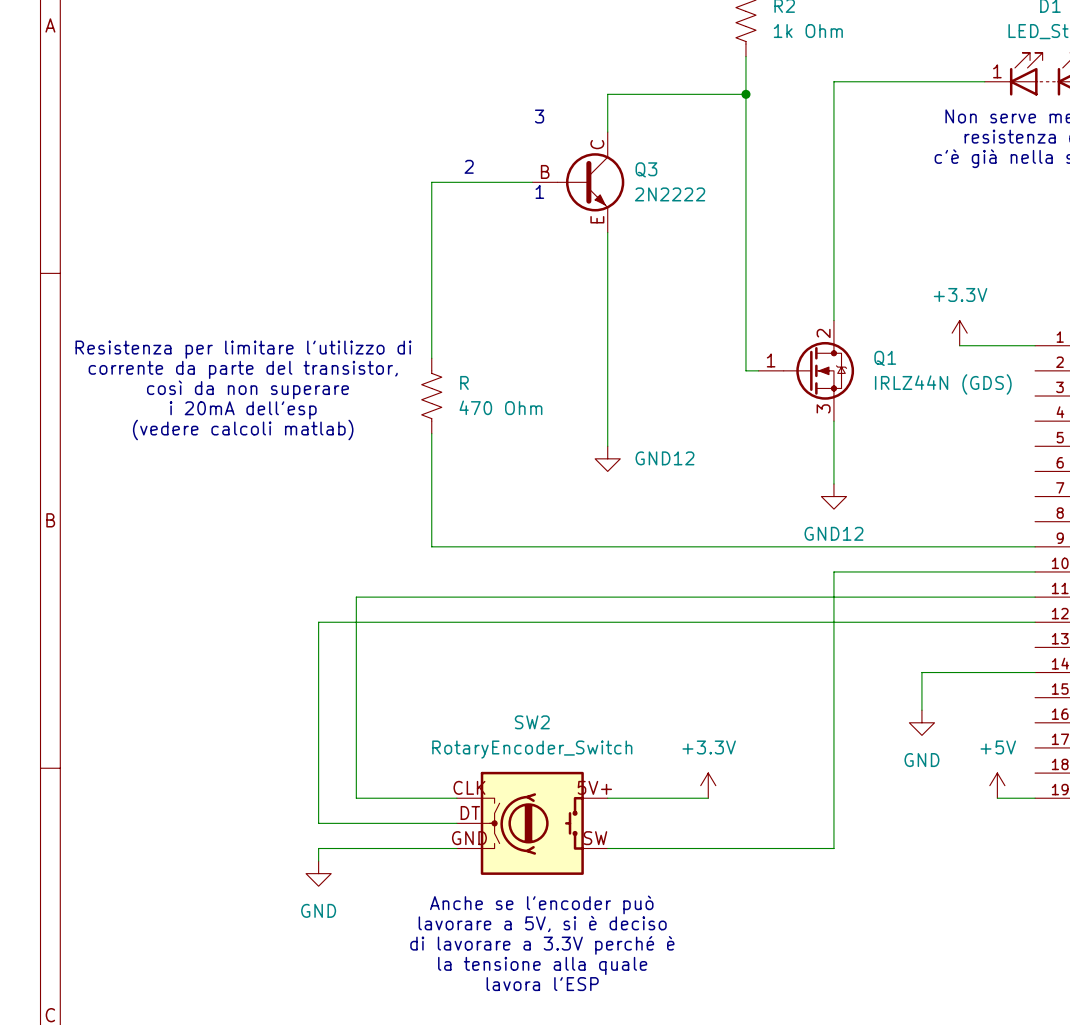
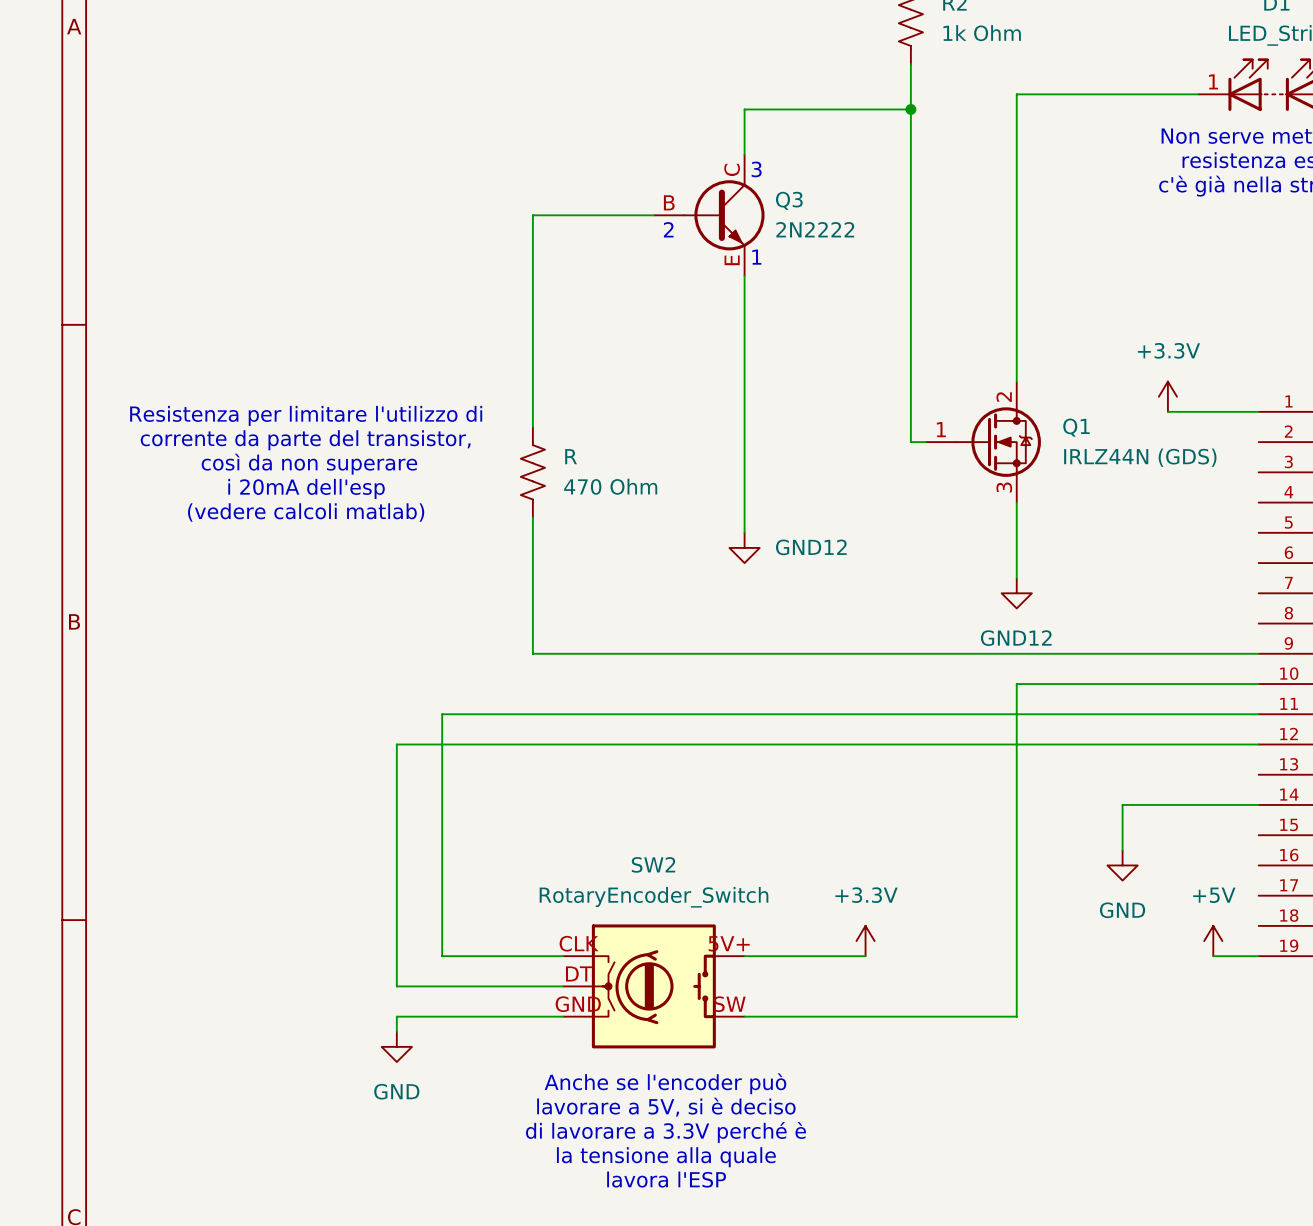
text position: 3 (539, 116) -> 3 (756, 169)
text: 2 (469, 166) -> none
text: 1 (539, 191) -> 2 (668, 229)
text: none -> 1 (756, 257)

